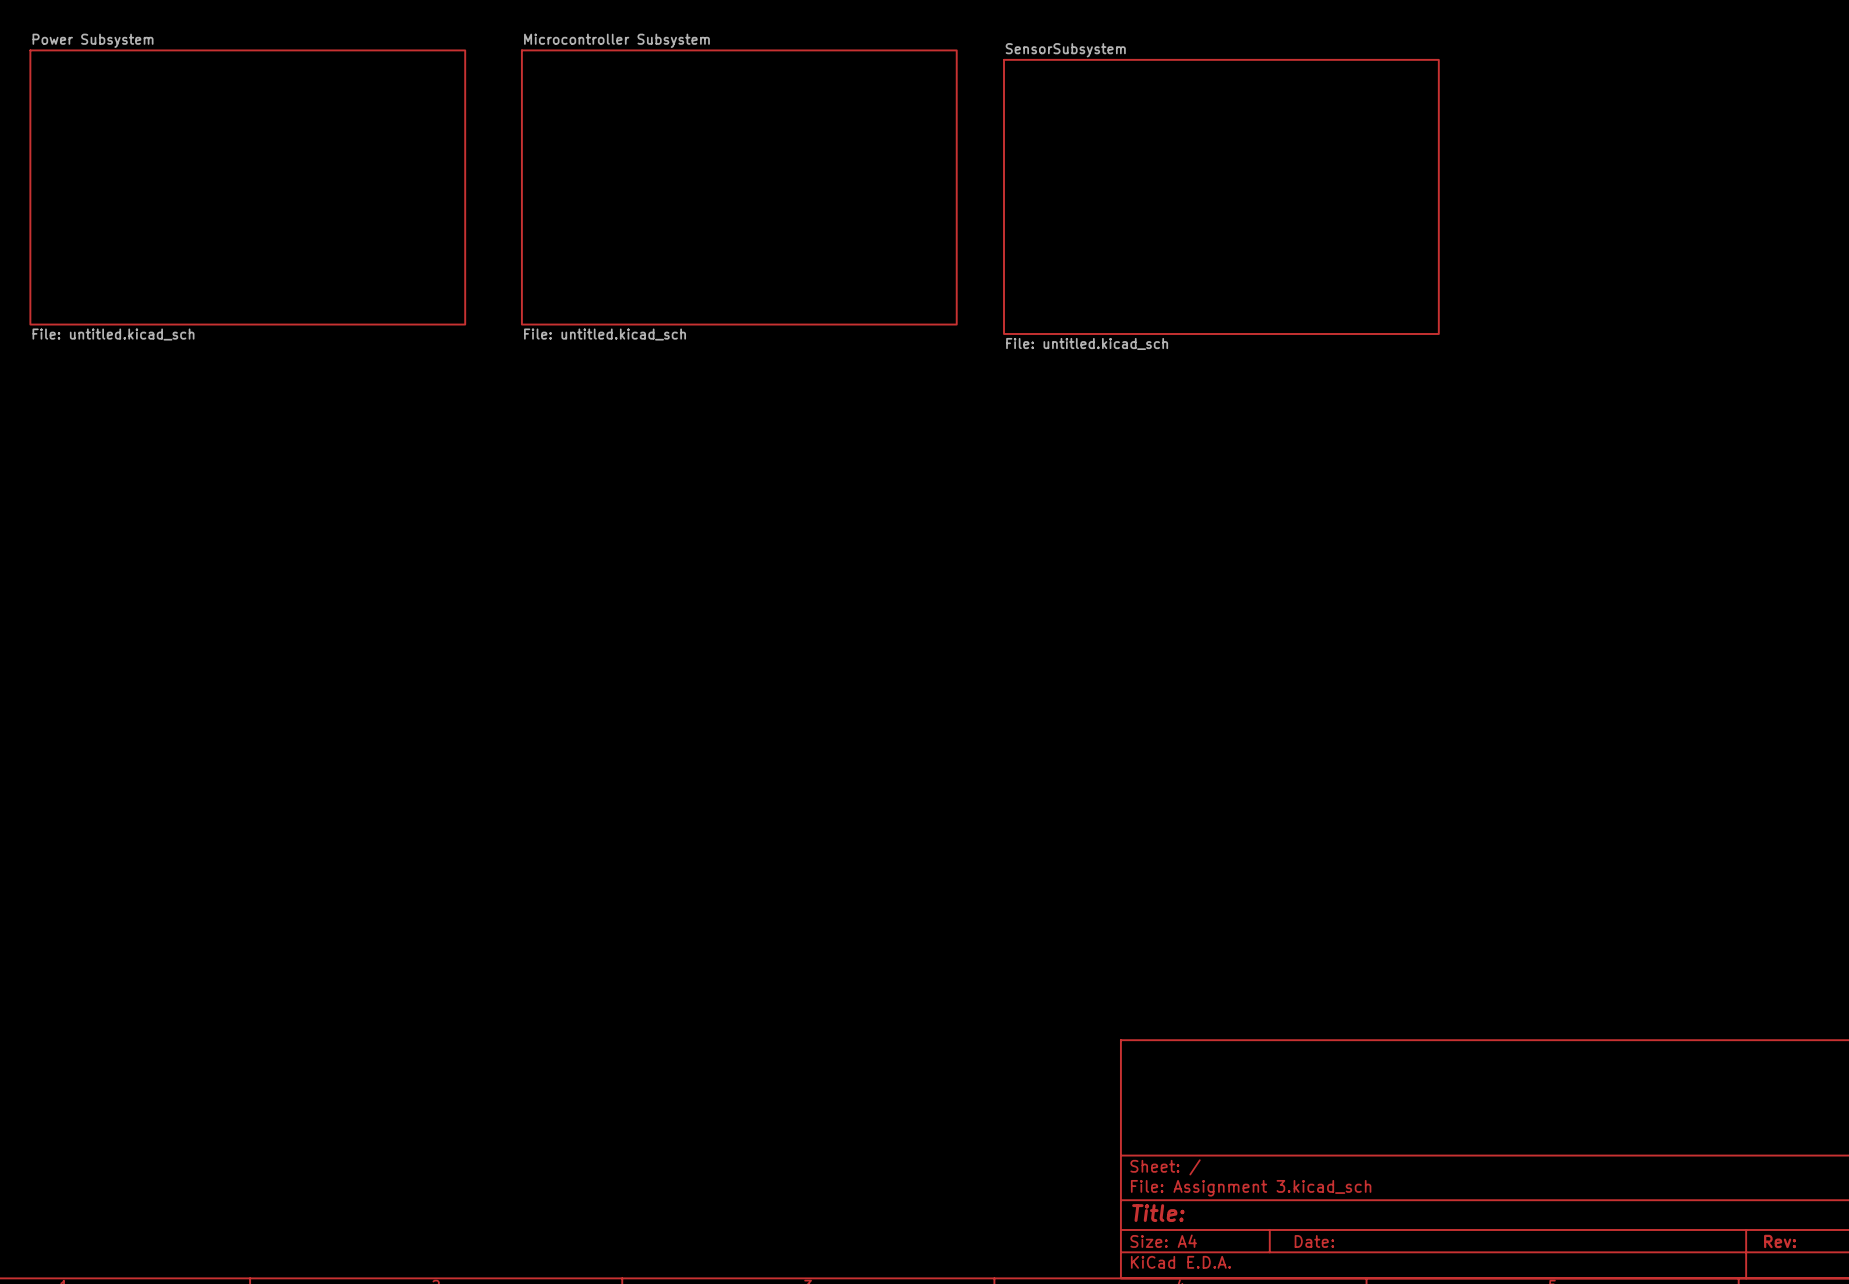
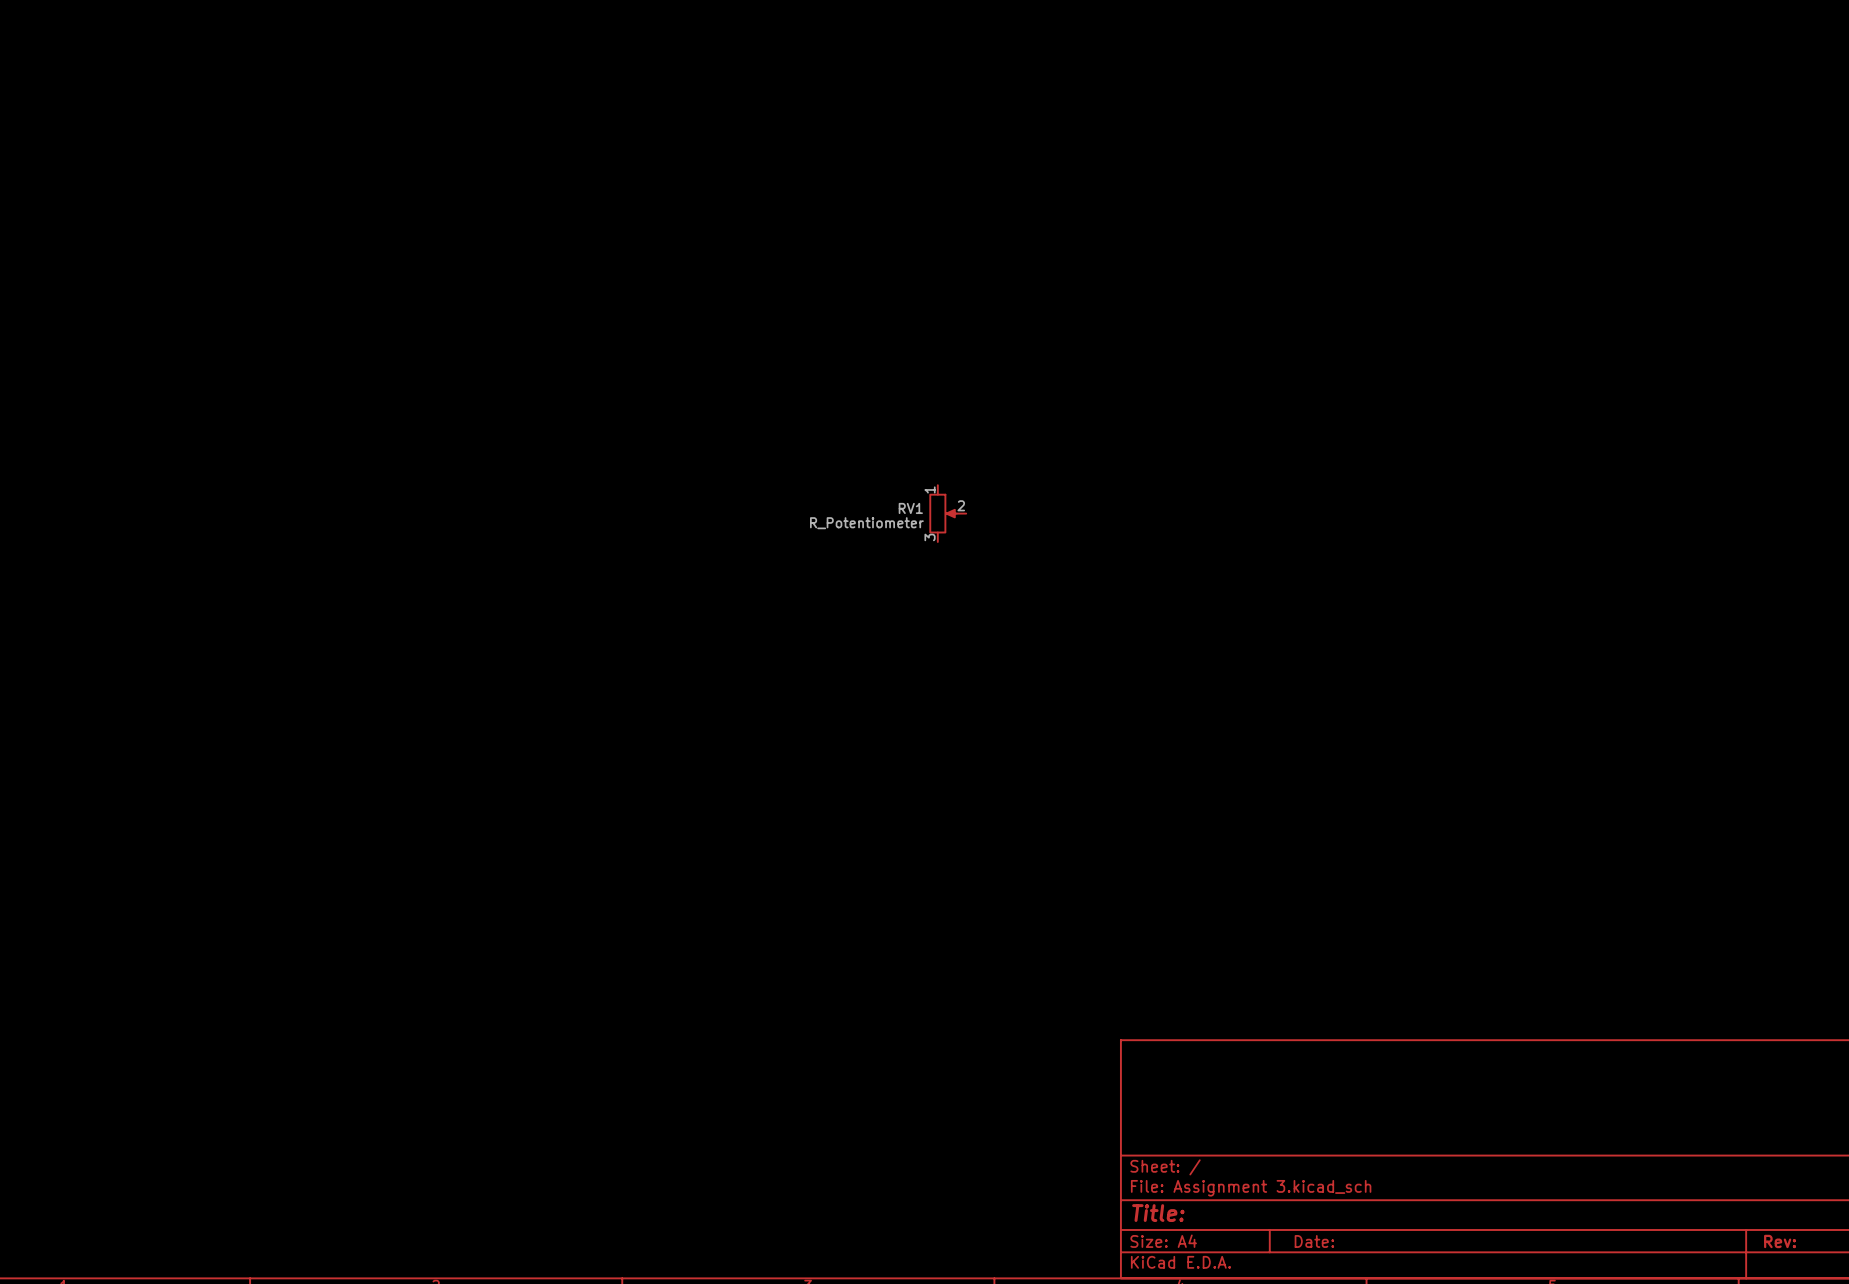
sheet Power Subsystem: File: untitled.kicad_sch (247, 187) -> none
sheet Microcontroller Subsystem: File: untitled.kicad_sch (739, 187) -> none
sheet SensorSubsystem: File: untitled.kicad_sch (1221, 196) -> none
RV1: none -> R_Potentiometer (947, 513)

